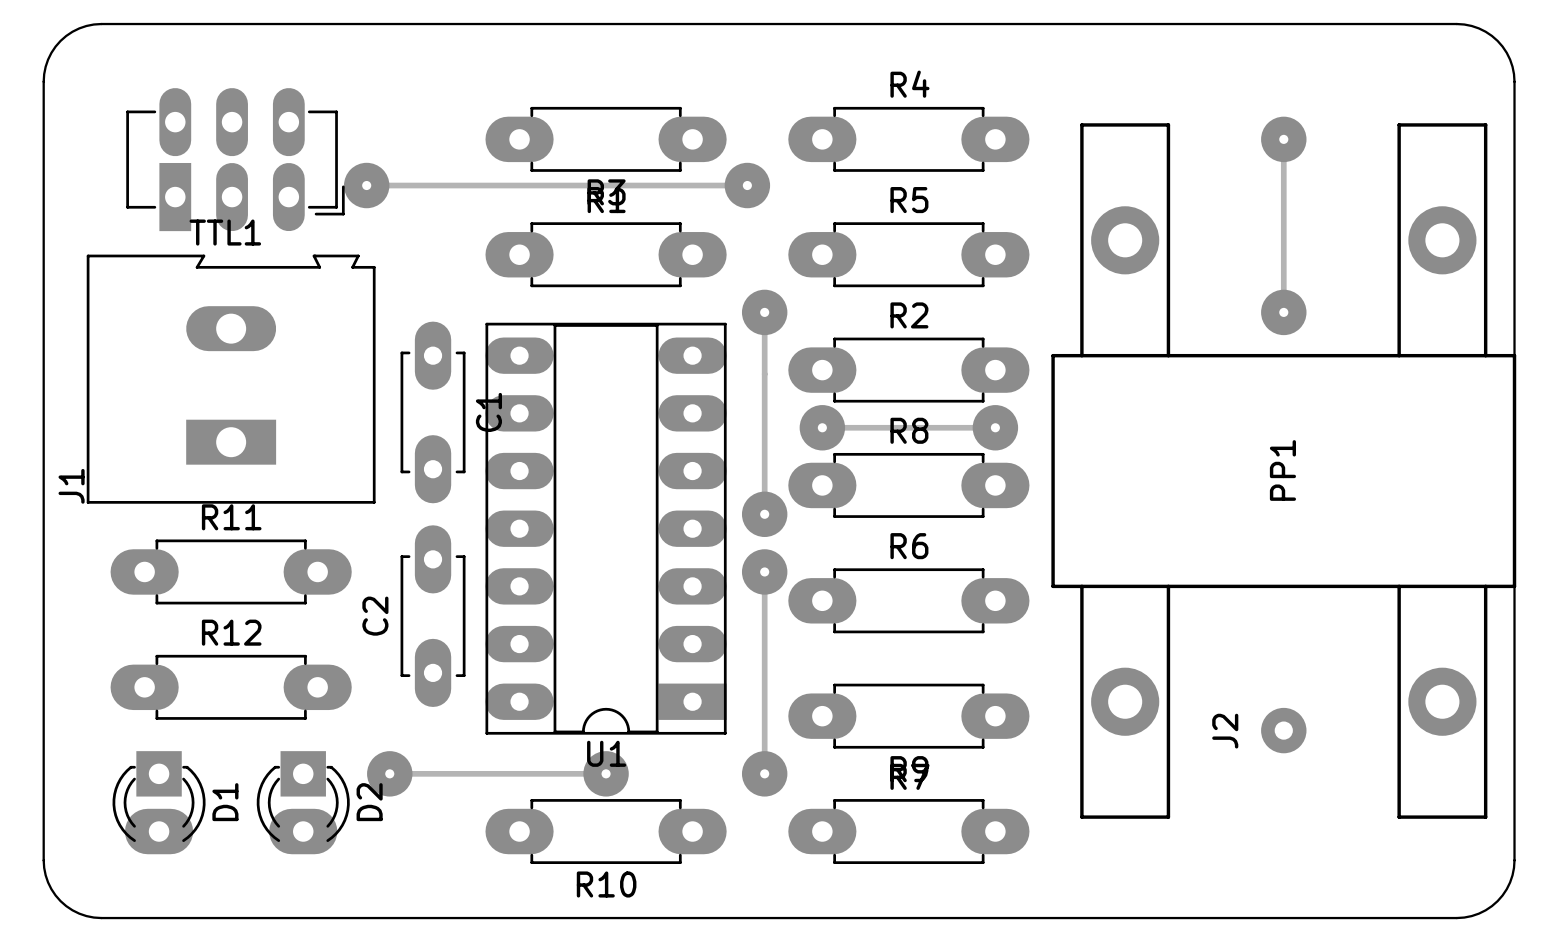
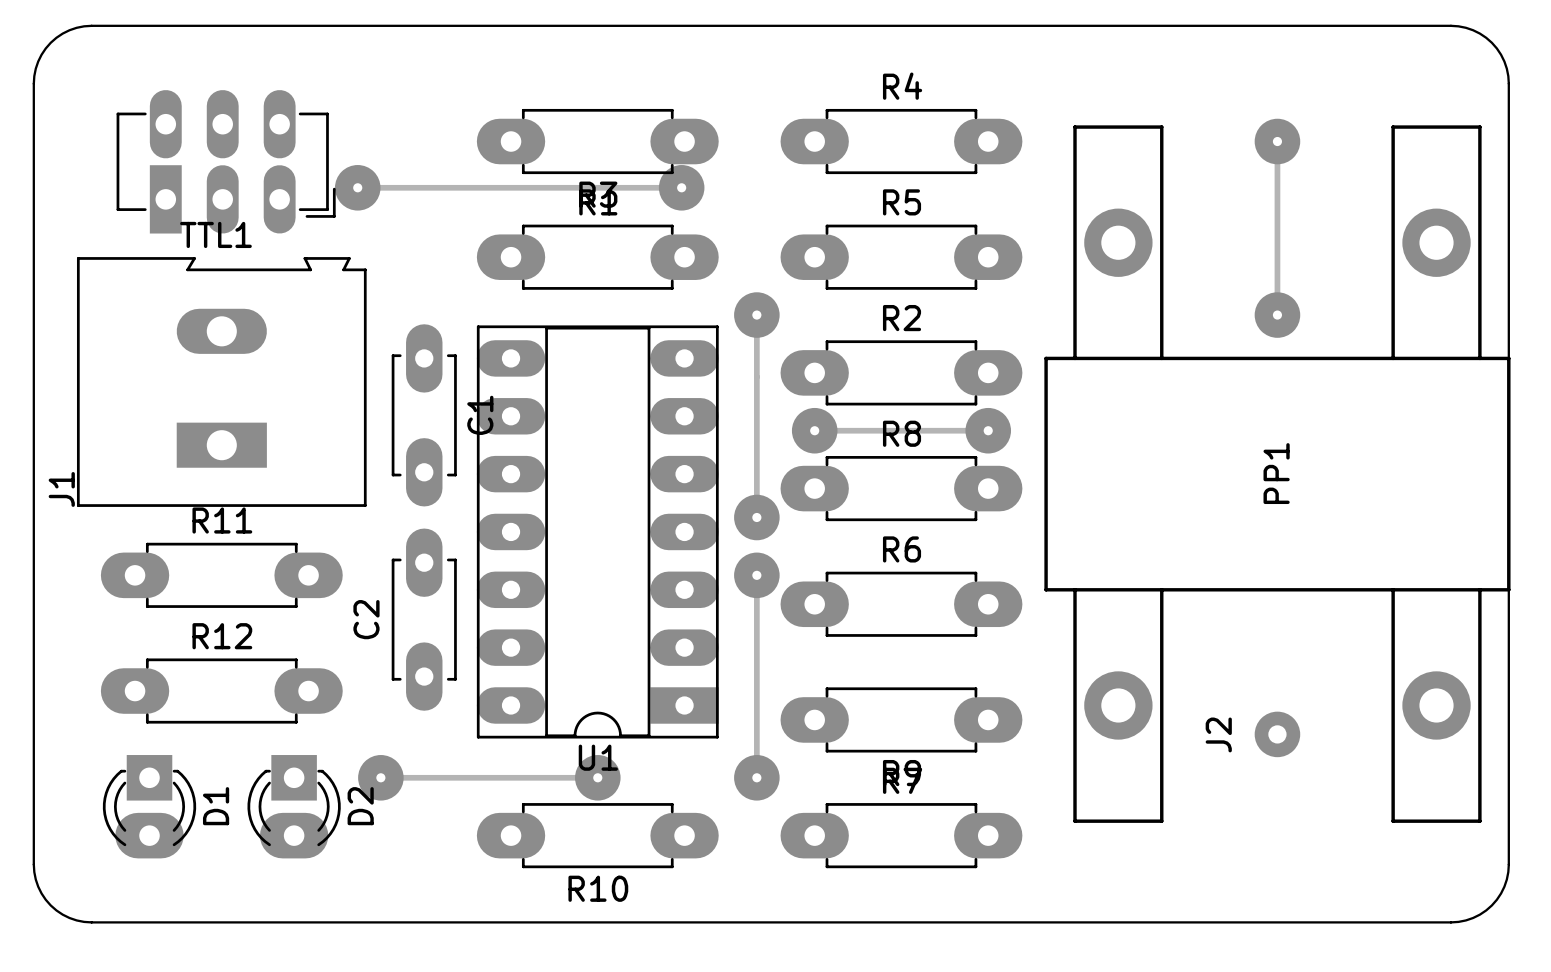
track: (689, 185) (747, 185) -> none
via position: (747, 185) -> (681, 187)

